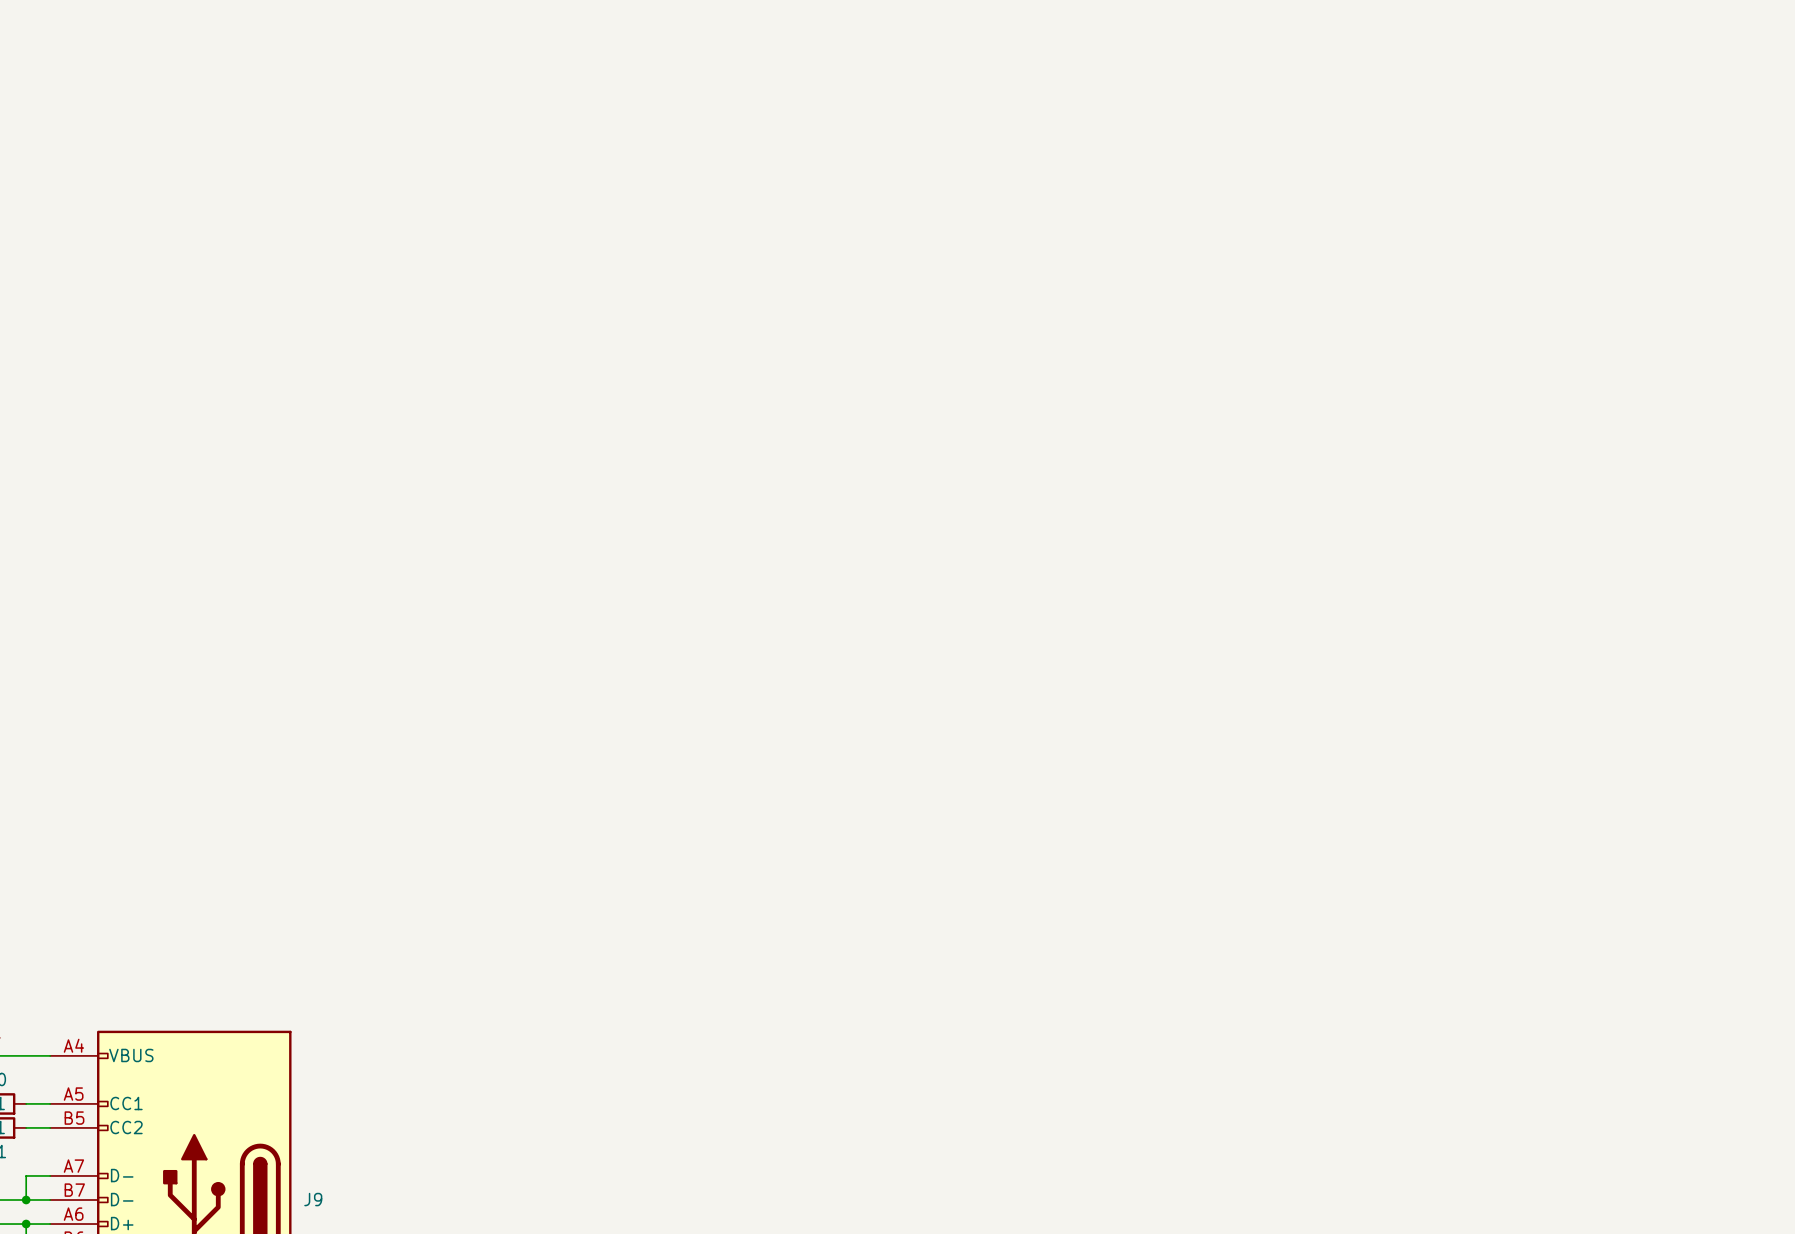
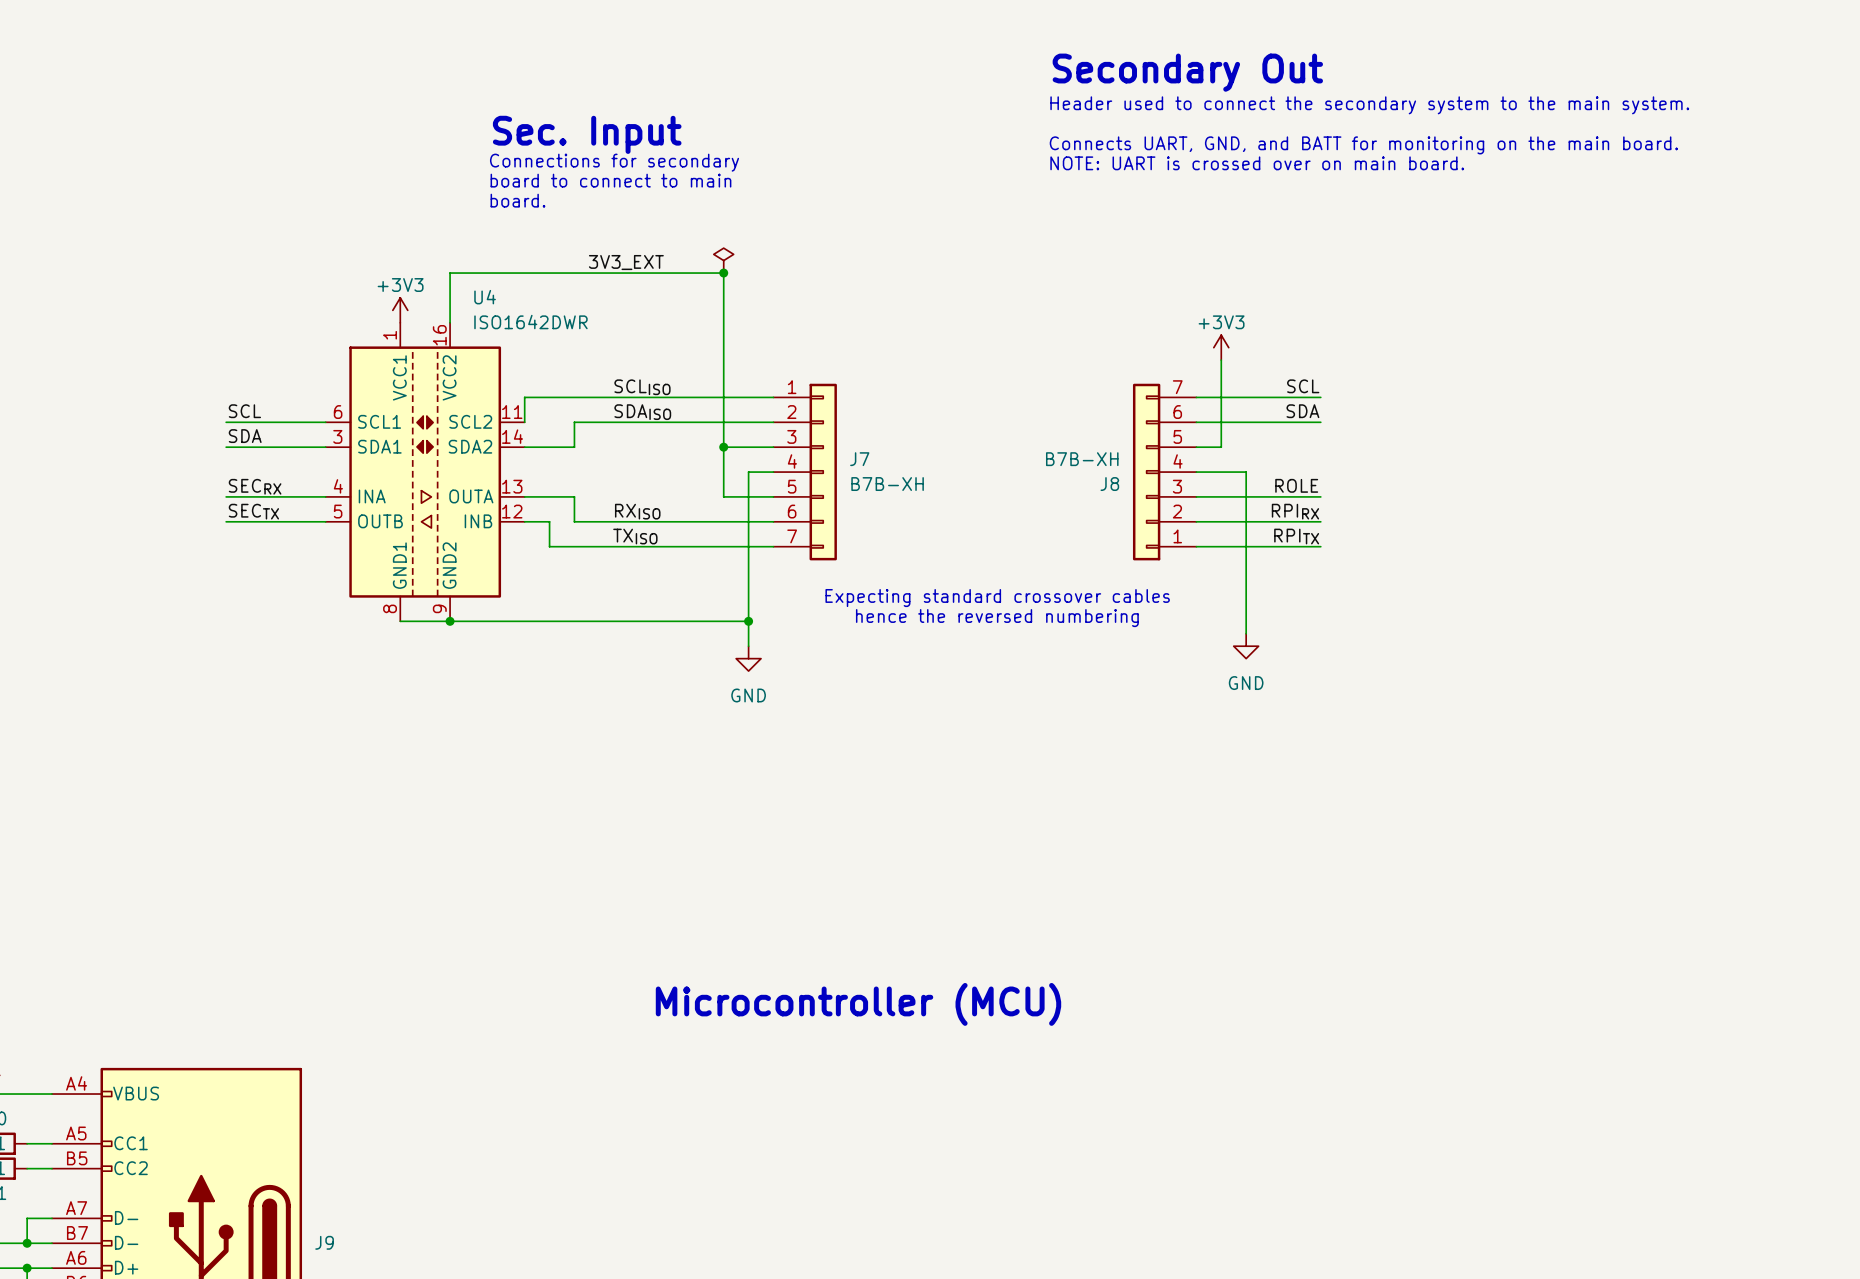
text: none -> Secondary Out (1187, 72)
text: none -> Header used to connect the secondary system to the main system. (1369, 105)
text: none -> Sec. Input (587, 134)
text: none -> Connects UART, GND, and BATT for monitoring on the main board. (1363, 145)
text: none -> Connections for secondary (614, 162)
text: none -> NOTE: UART is crossed over on main board. (1257, 163)
text: none -> board to connect to main (610, 180)
text: none -> board. (517, 200)
power symbol: none -> (723, 260)
label: none -> 3V3_EXT (626, 262)
junction: none -> (723, 273)
power symbol: none -> +3V3 (400, 310)
wire: none -> (450, 322) (450, 273) (723, 273) (723, 496) (773, 496)
power symbol: none -> +3V3 (1221, 347)
wire: none -> (1221, 360) (1221, 447) (1196, 447)
label: none -> SCL (1303, 386)
label: none -> SCLISO (642, 387)
wire: none -> (773, 397) (524, 397) (524, 422)
wire: none -> (1196, 397) (1320, 397)
label: none -> SCL (244, 411)
label: none -> SDA (1302, 411)
label: none -> SDAISO (642, 412)
wire: none -> (226, 422) (325, 422)
wire: none -> (773, 422) (574, 422) (574, 447) (524, 447)
wire: none -> (1196, 422) (1320, 422)
label: none -> SDA (245, 436)
wire: none -> (226, 447) (325, 447)
wire: none -> (723, 447) (773, 447)
junction: none -> (723, 447)
U4: none -> ISO1642DWR (425, 472)
wire: none -> (773, 472) (748, 472) (748, 646)
J7: none -> B7B-XH (805, 472)
J8: none -> B7B-XH (1164, 472)
wire: none -> (1196, 472) (1246, 472) (1246, 633)
label: none -> ROLE (1296, 485)
label: none -> SECRX (255, 486)
wire: none -> (226, 496) (325, 496)
wire: none -> (524, 496) (574, 496) (574, 521) (773, 521)
wire: none -> (1196, 496) (1320, 496)
label: none -> SECTX (253, 511)
label: none -> RXISO (637, 511)
label: none -> RPIRX (1295, 511)
wire: none -> (226, 521) (325, 521)
wire: none -> (524, 521) (549, 521) (549, 546) (773, 546)
wire: none -> (1196, 521) (1320, 521)
label: none -> TXISO (635, 536)
label: none -> RPITX (1296, 536)
wire: none -> (1196, 546) (1320, 546)
text: none -> Expecting standard crossover cables (997, 598)
text: none -> hence the reversed numbering (997, 618)
wire: none -> (400, 621) (748, 621)
junction: none -> (450, 621)
junction: none -> (748, 621)
power symbol: none -> GND (1246, 646)
power symbol: none -> GND (748, 658)
text: none -> Microcontroller (MCU) (858, 1004)

